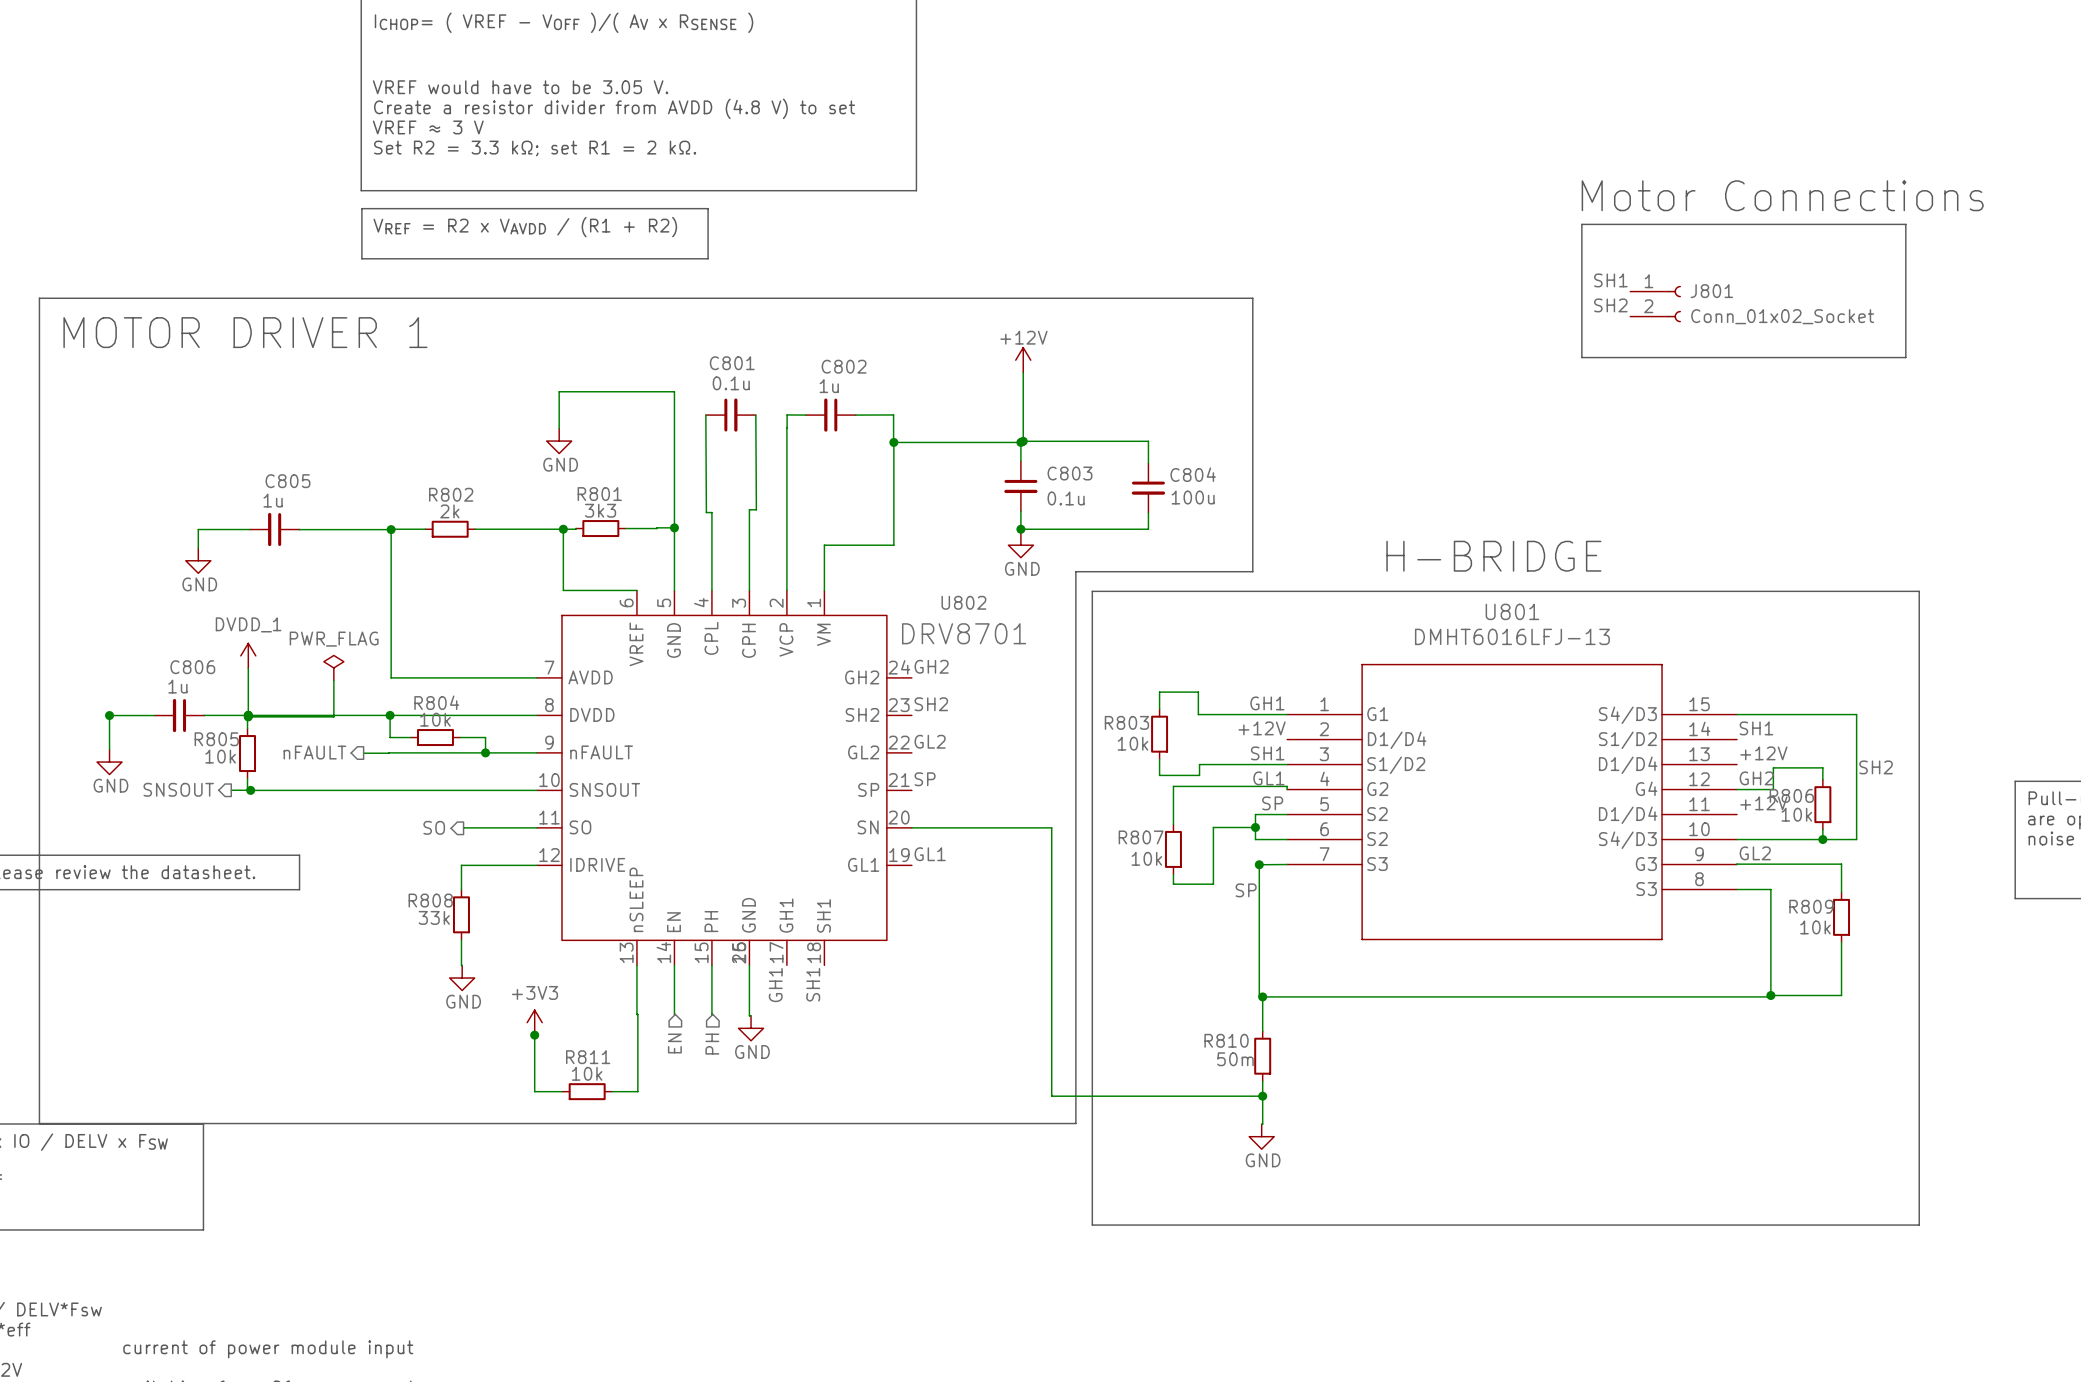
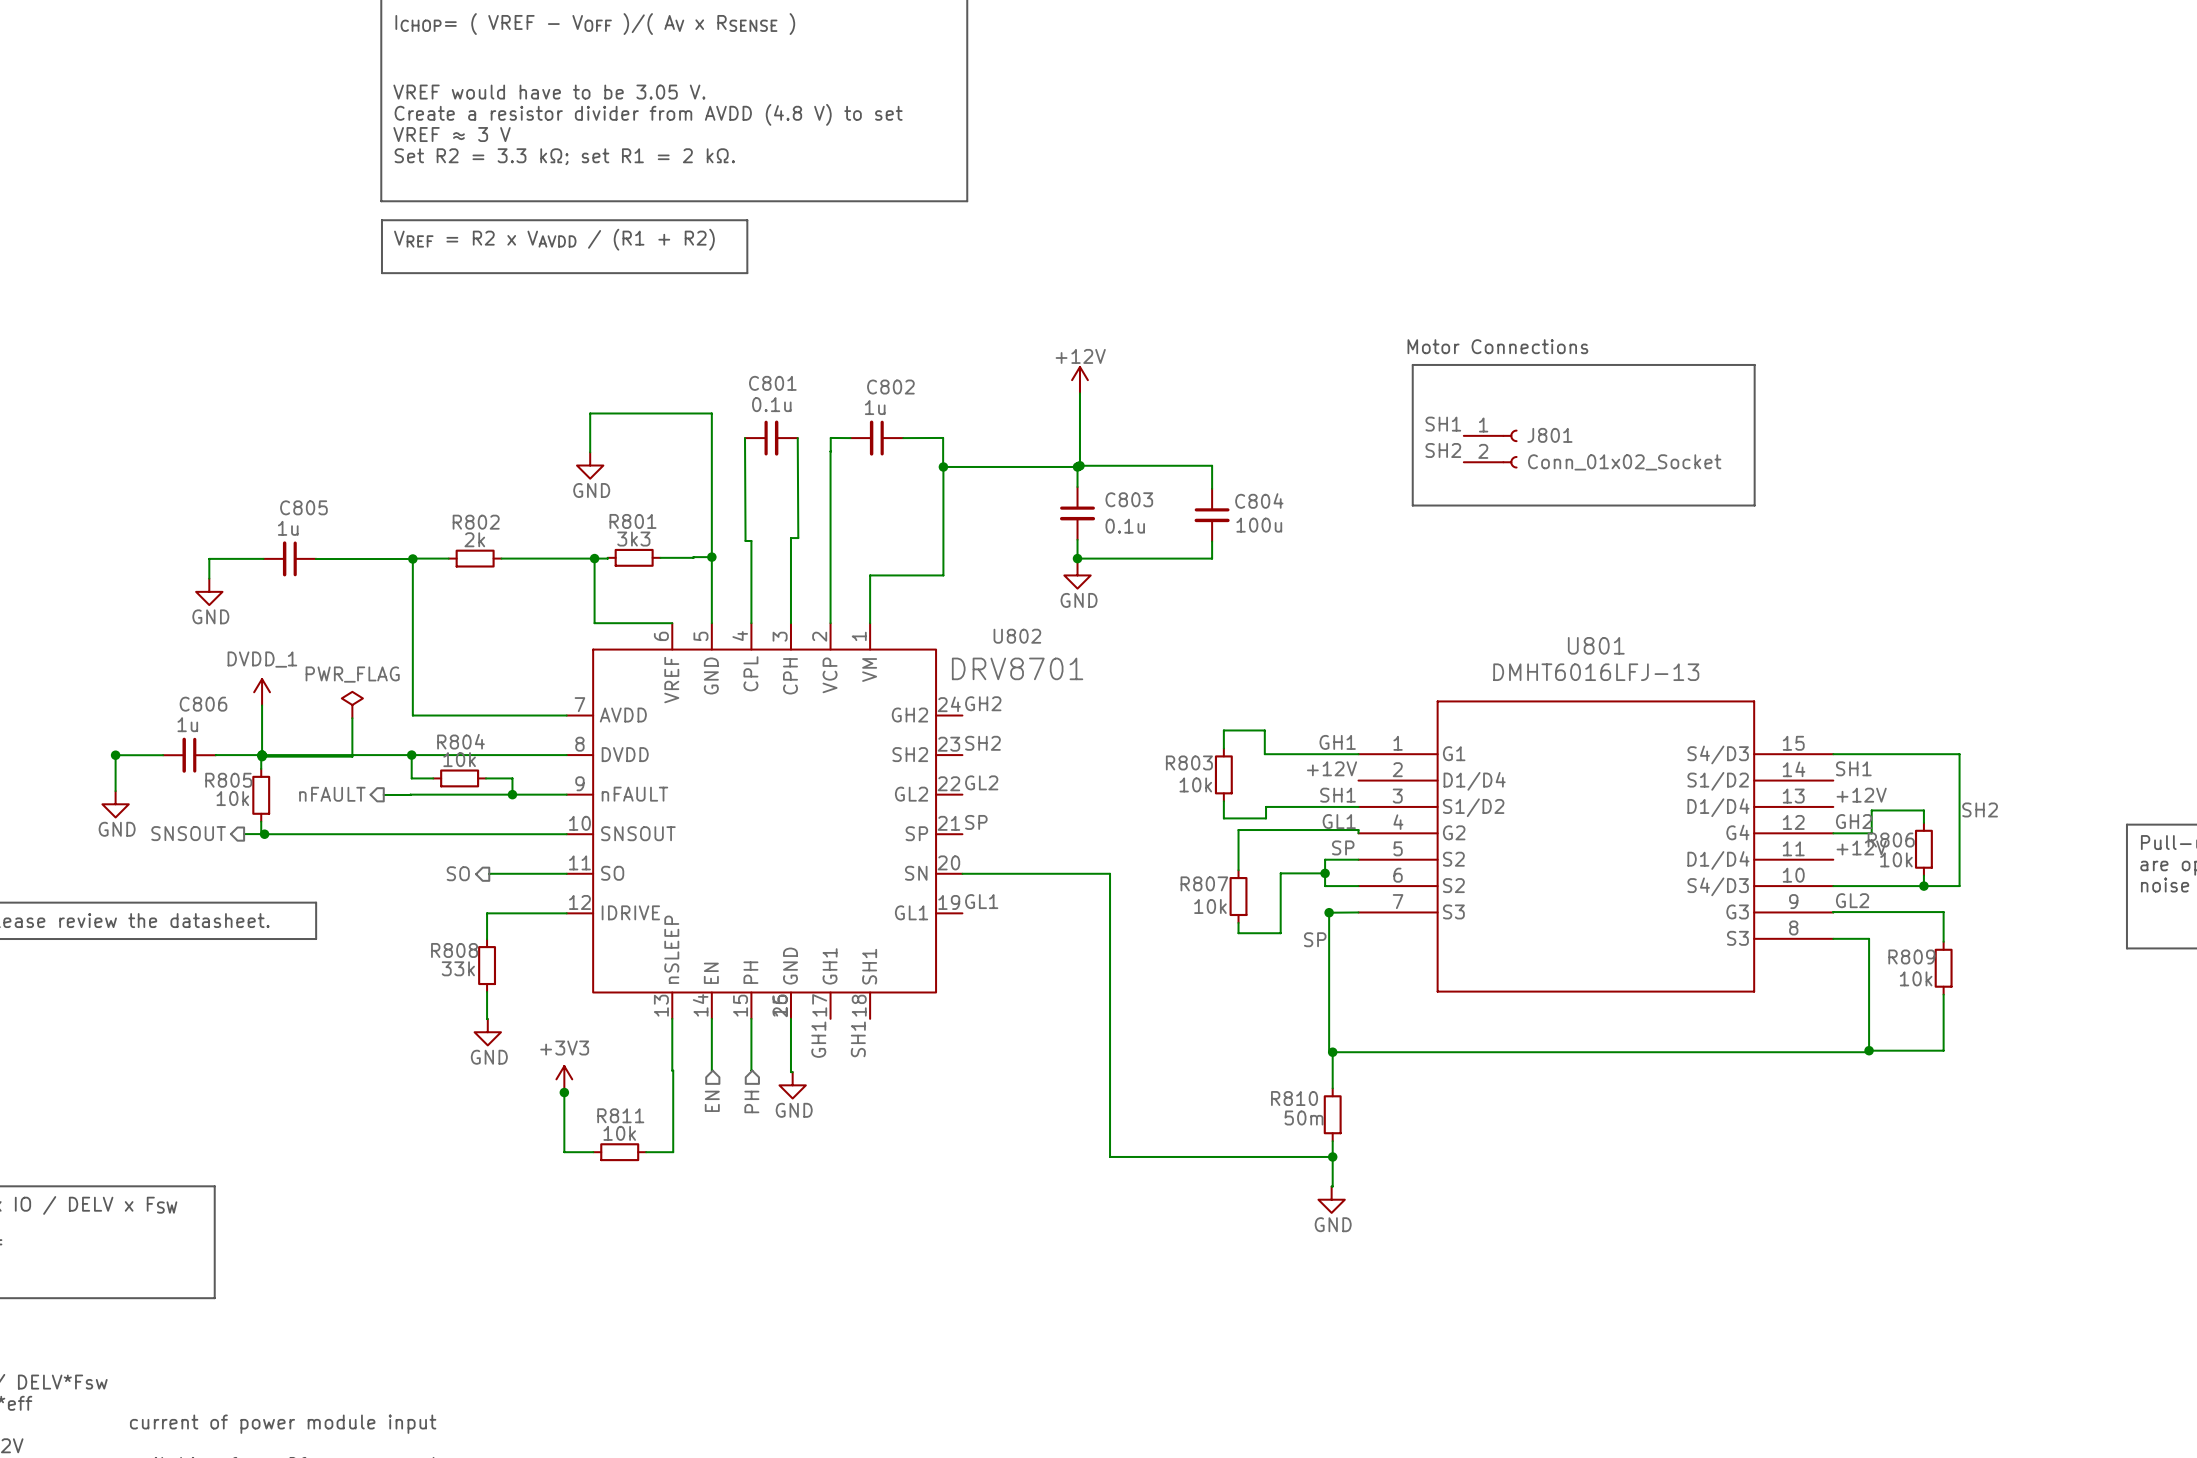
text: Motor Connections (1782, 195) -> none
line: (1581, 224) (1905, 224) (1905, 357) (1581, 357) (1581, 224) -> none
label: SH1 (1610, 280) -> none
J801 position: (1655, 304) -> (1490, 449)
label: SH2 (1610, 305) -> none
text: none -> Motor Connections (1497, 346)
text: MOTOR DRIVER 1 (245, 332) -> none
line: none -> (1412, 364) (1754, 364) (1754, 505) (1412, 505) (1412, 364)
label: none -> SH1 (1443, 424)
label: none -> SH2 (1443, 450)
text: H-BRIDGE (1493, 556) -> none
line: (1092, 591) (1919, 591) (1919, 1225) (1092, 1225) (1092, 591) -> none
line: (1075, 1123) (1075, 571) (1252, 571) (1252, 298) (39, 298) (39, 1123) (1075, 1123) -> none

